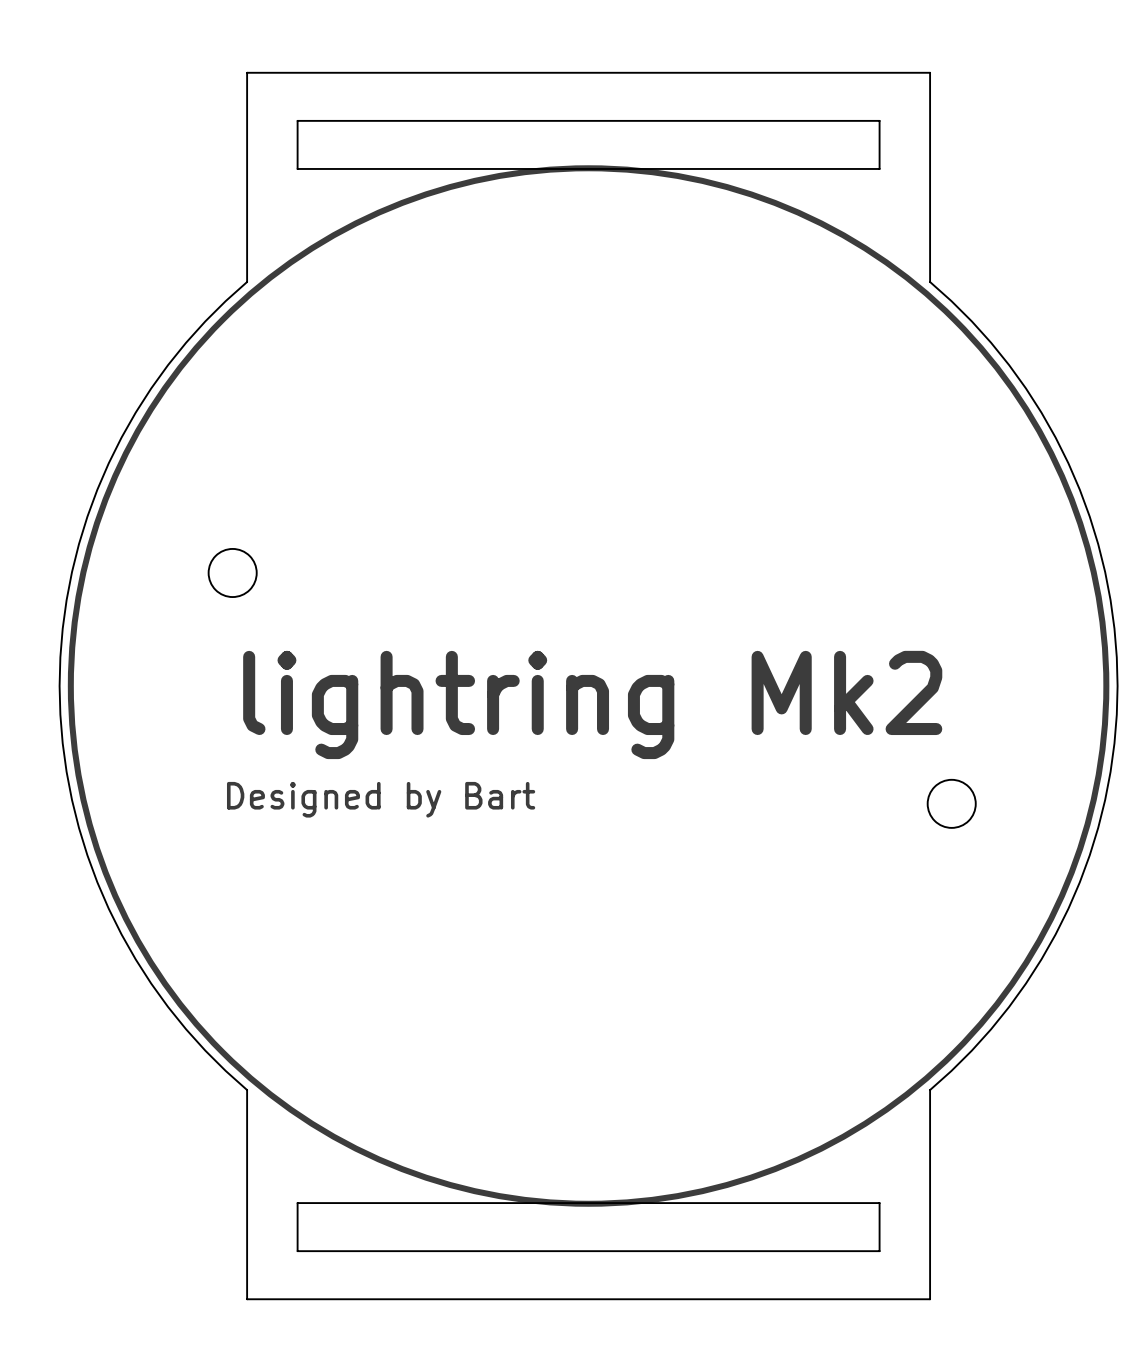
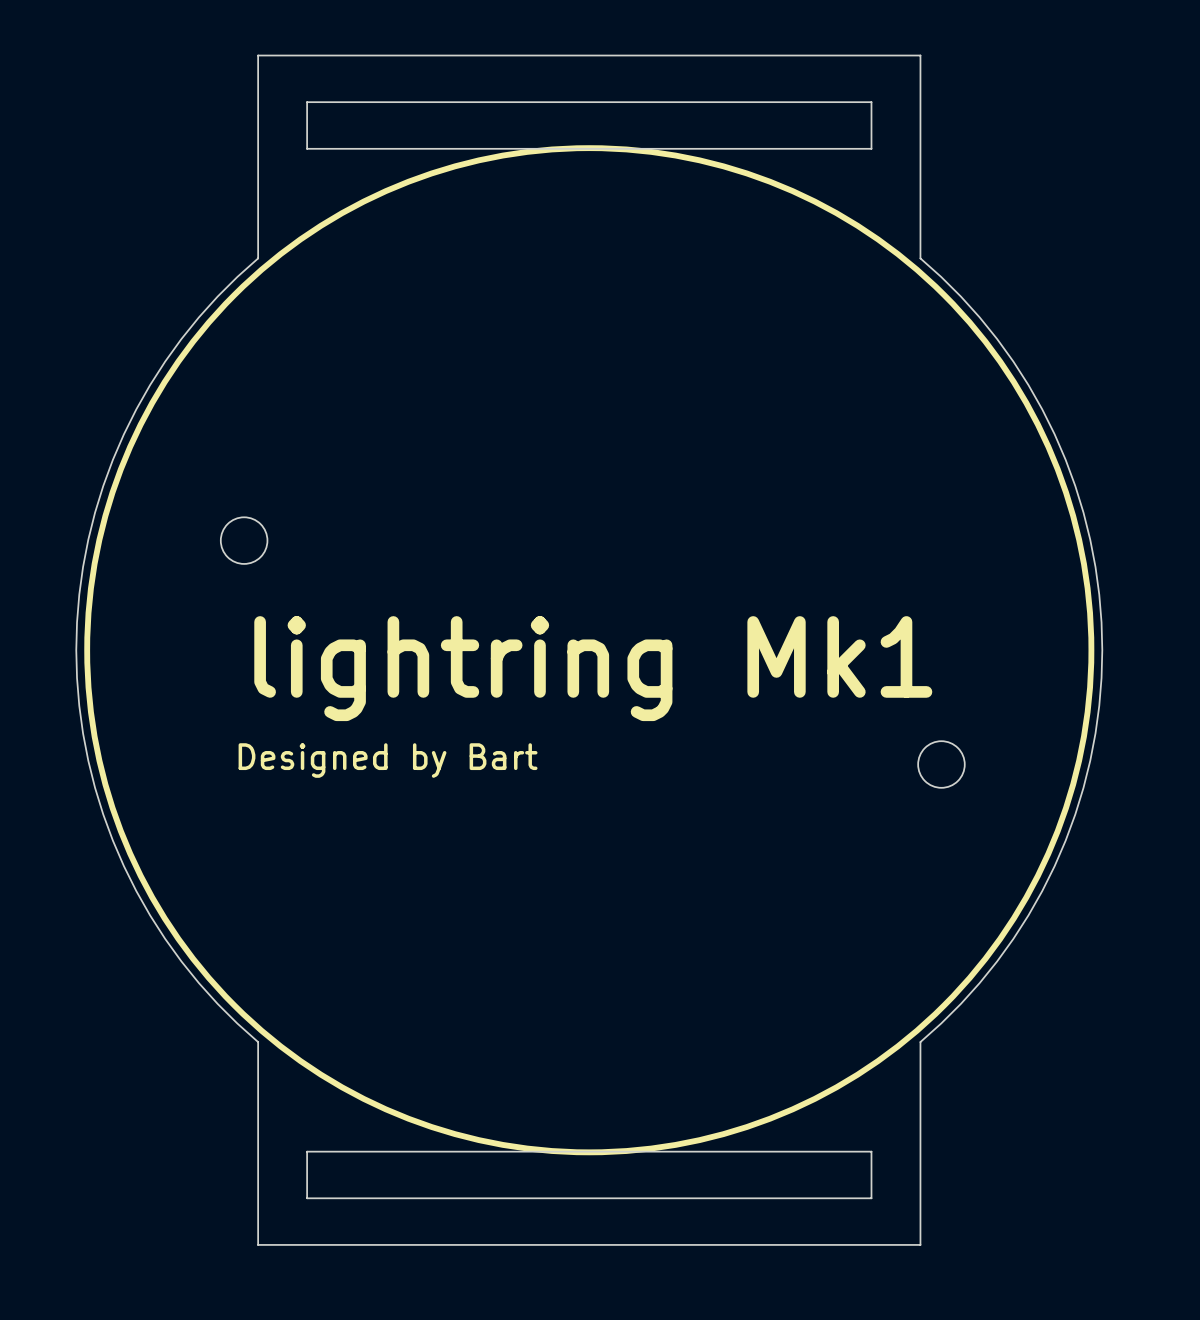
text: lightring Mk2 (592, 704) -> lightring Mk1 (593, 668)

